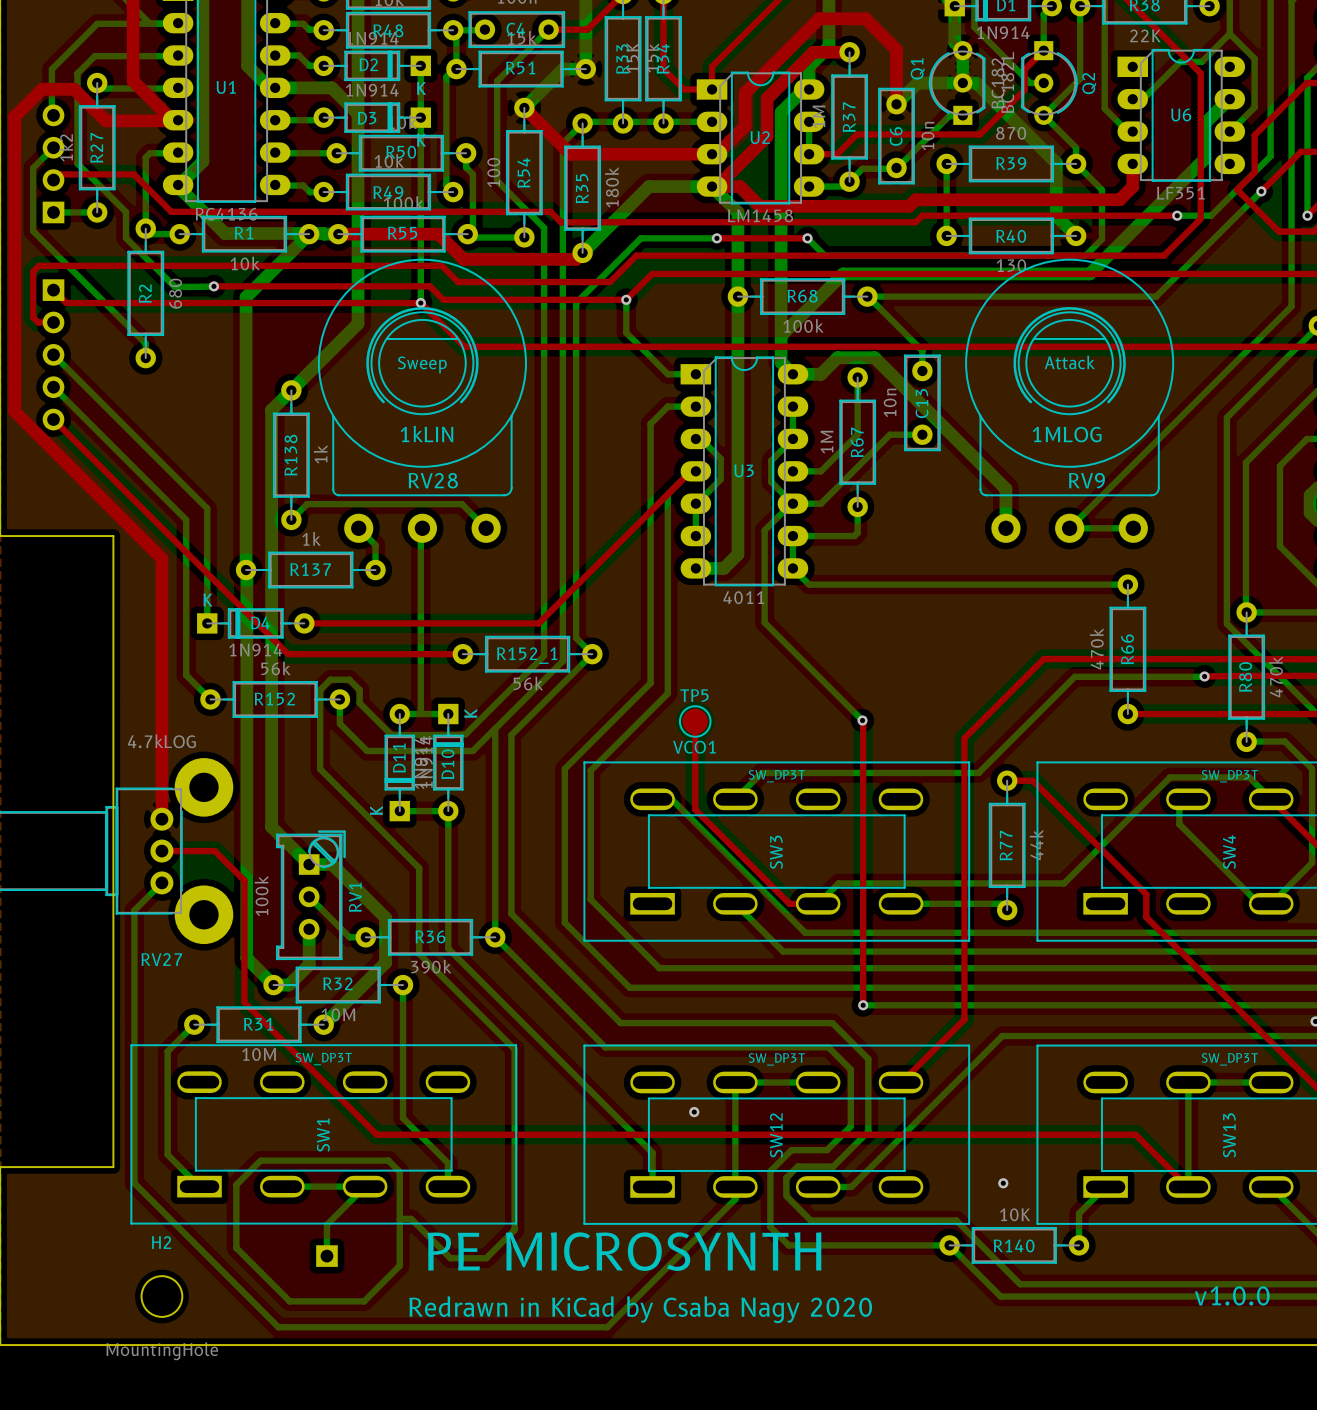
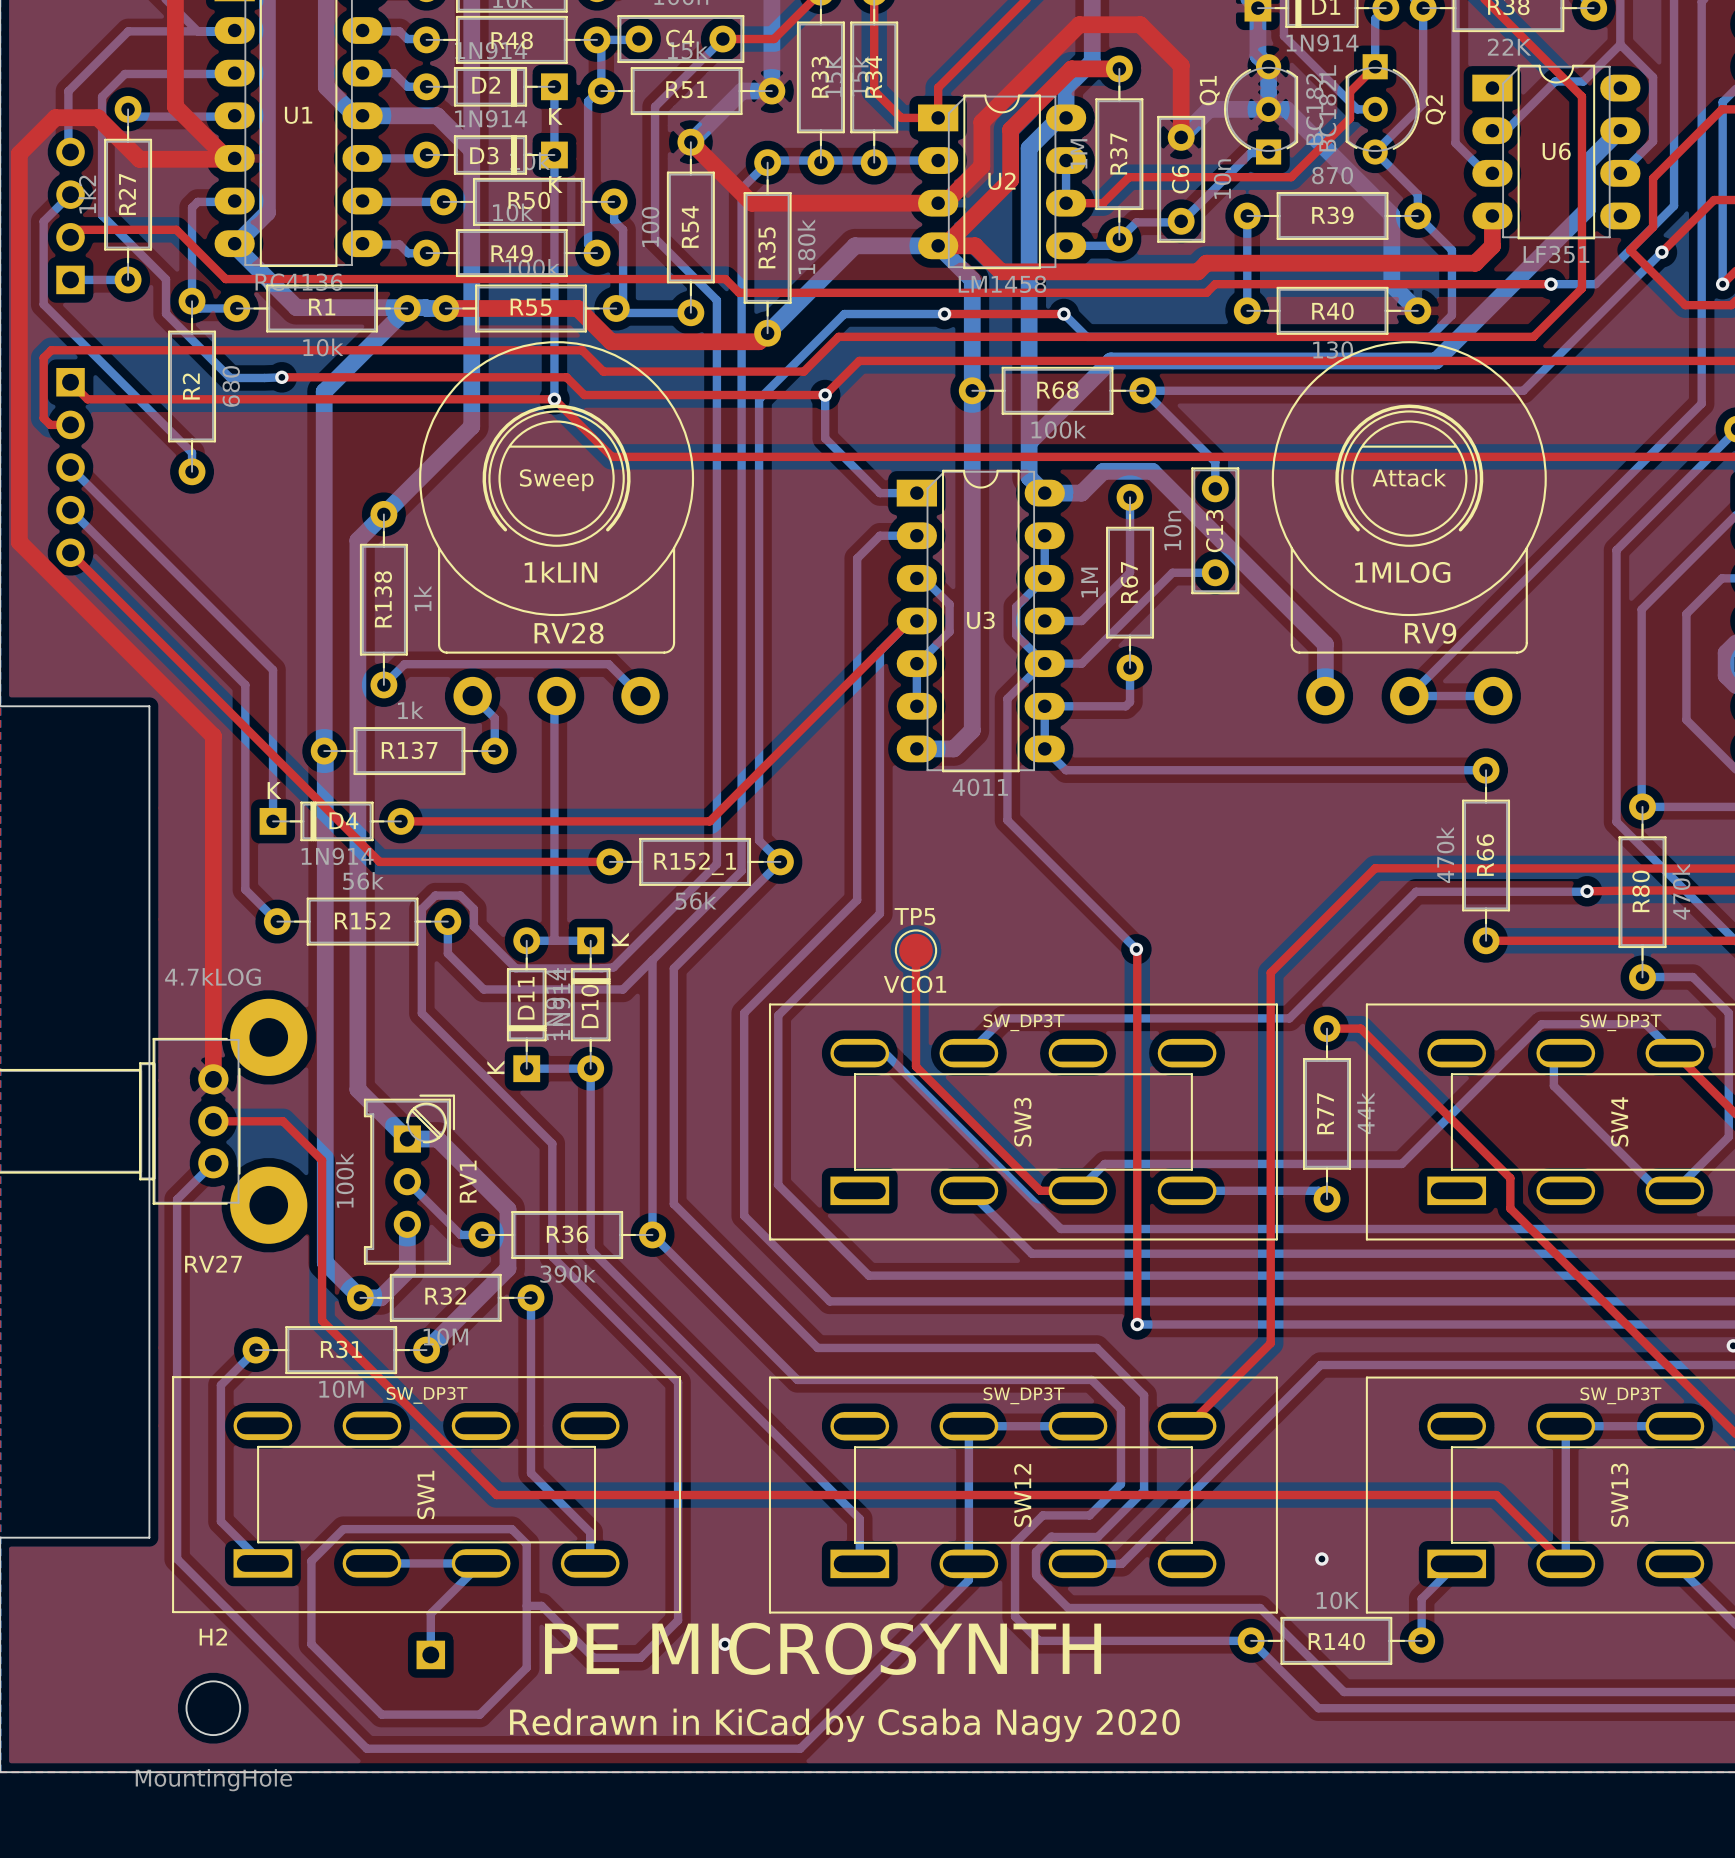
via: (694, 1112) -> none
via: none -> (724, 1644)
text: v1.0.0 (1232, 1295) -> none

